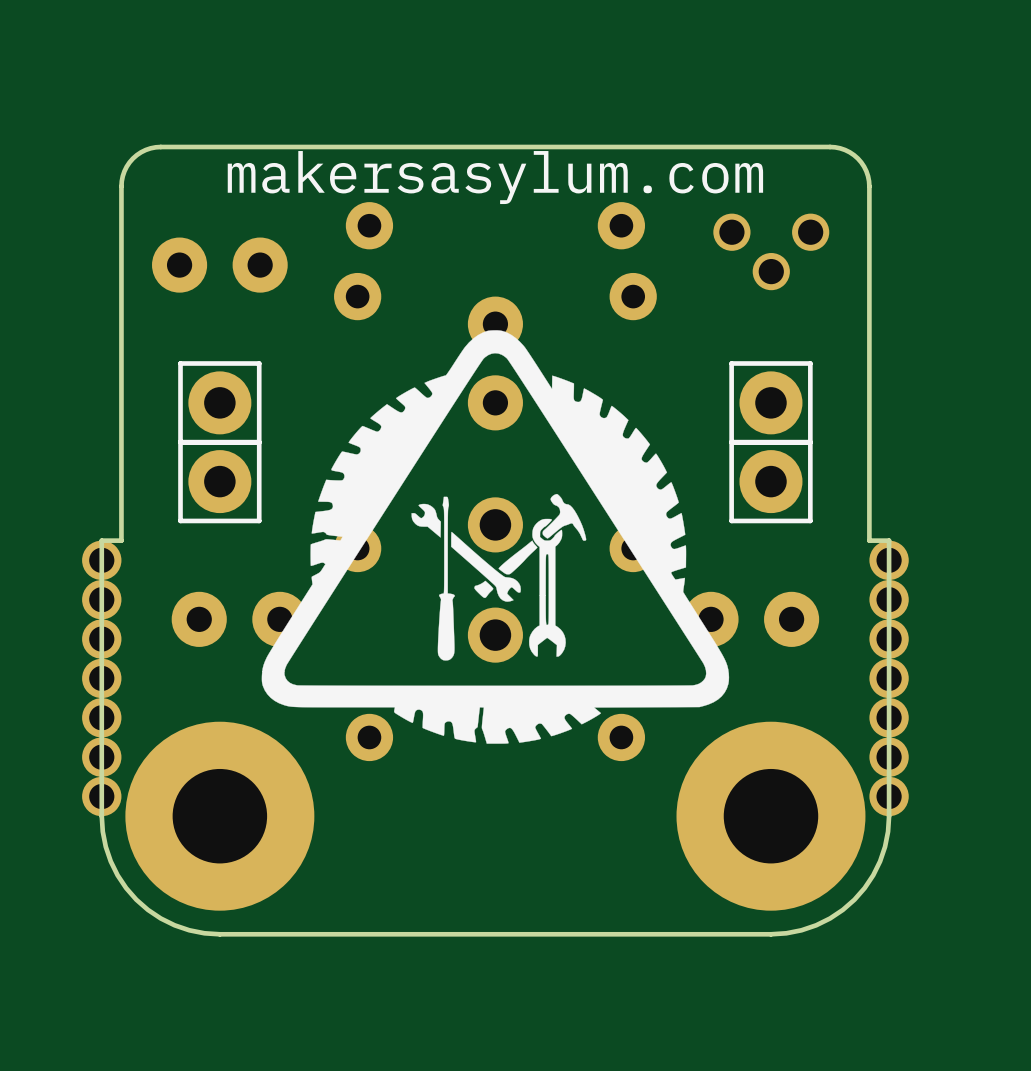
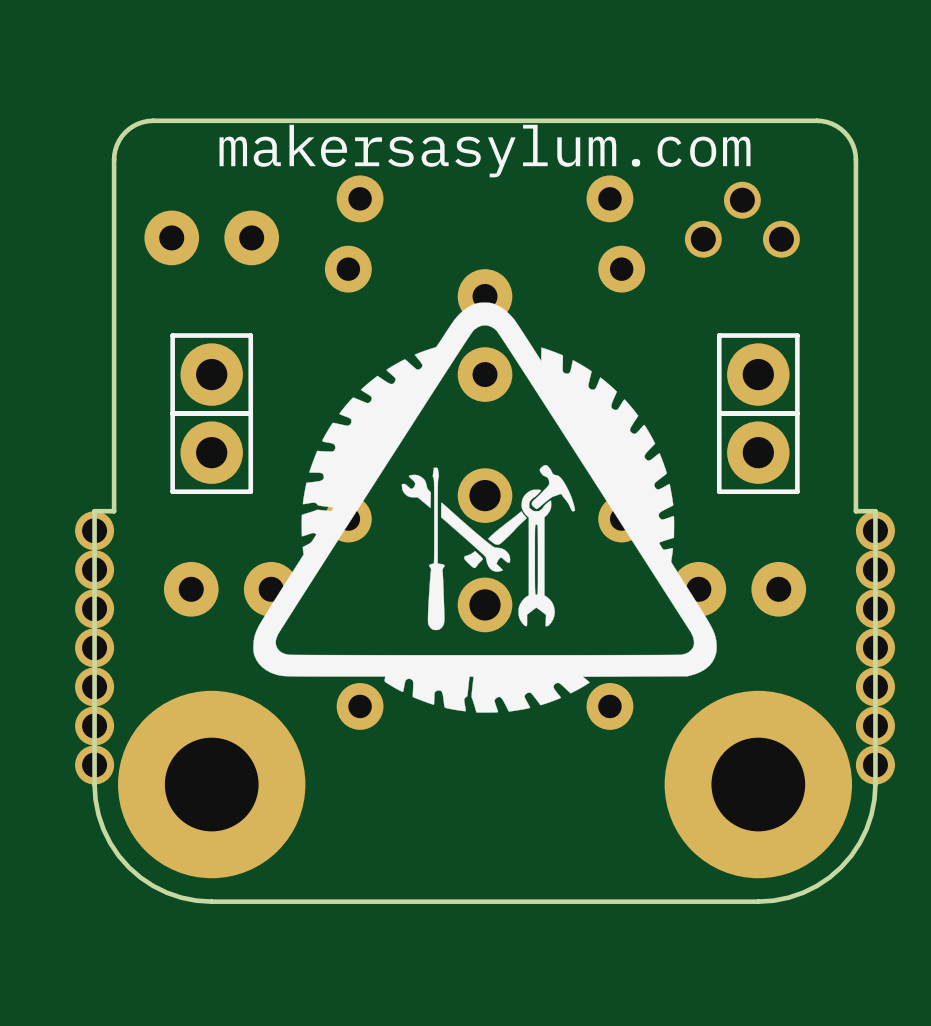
part rotation: 0° (771, 251) -> 180° (742, 219)

